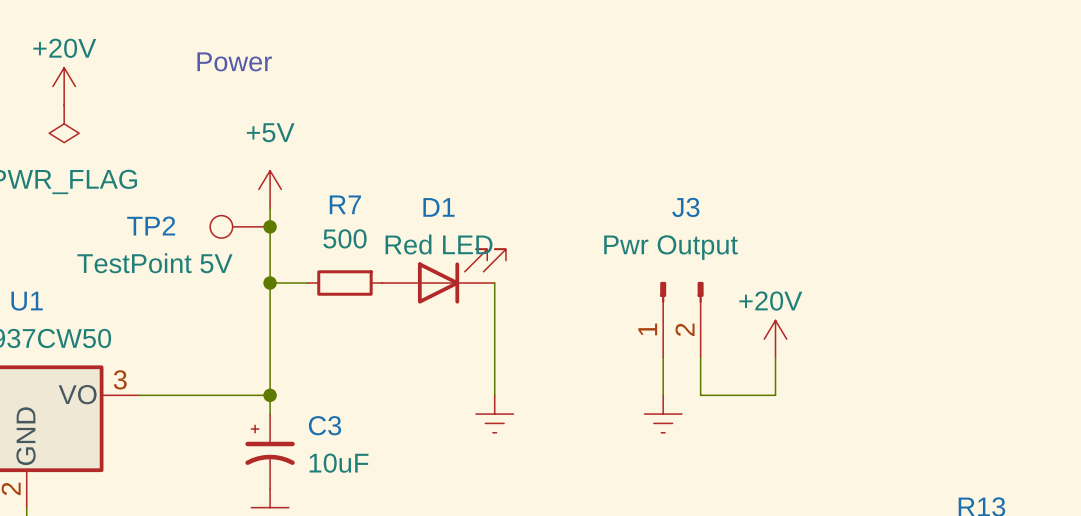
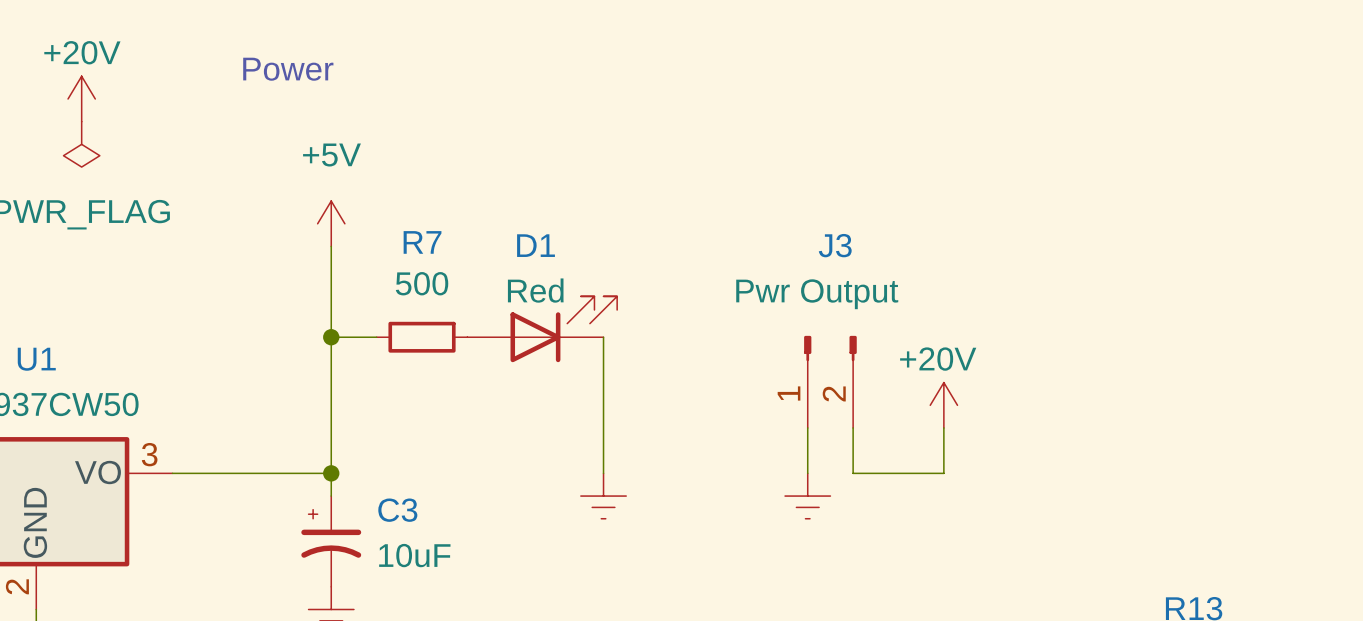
TP2: TestPoint 5V (240, 226) -> none
junction: (270, 226) -> none
D1 value: Red LED (439, 244) -> Red (535, 290)

